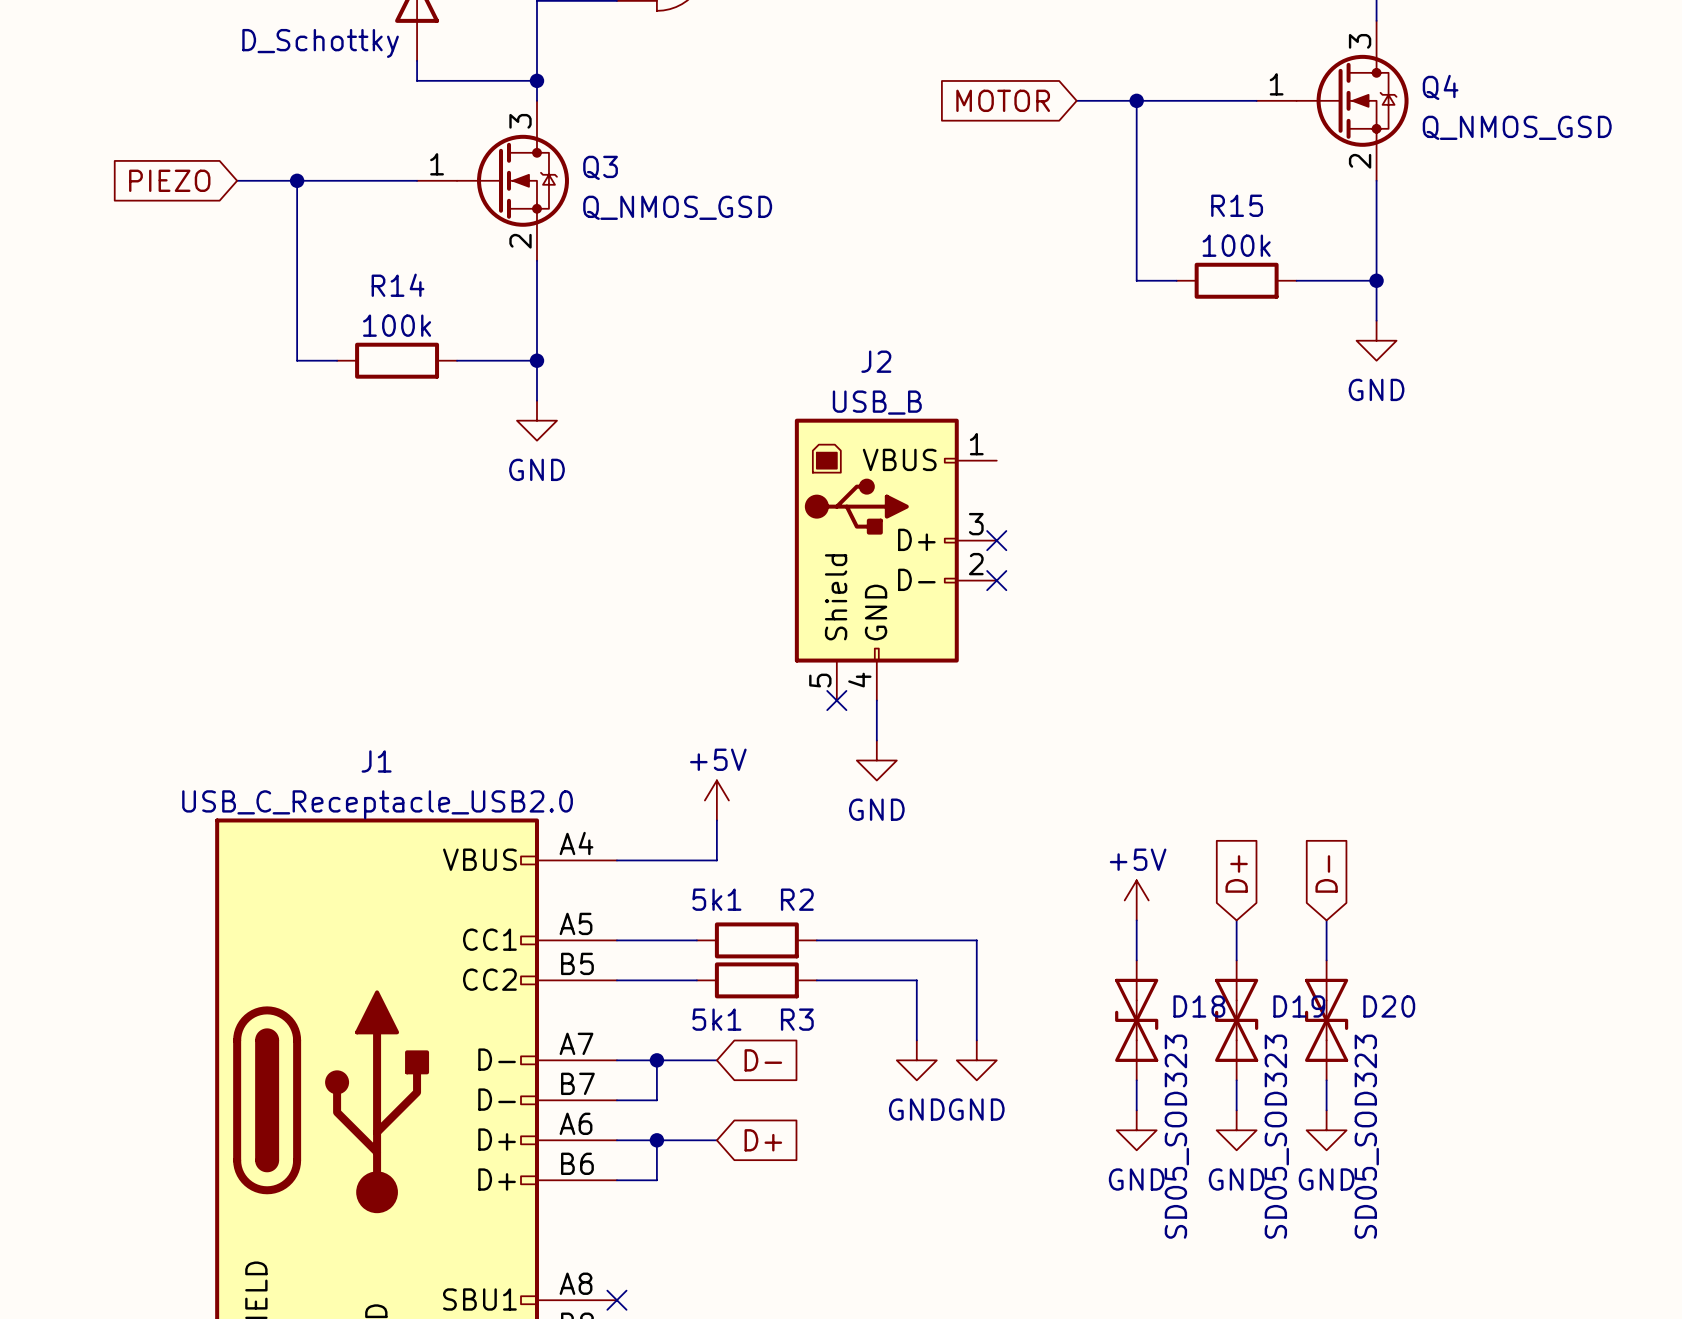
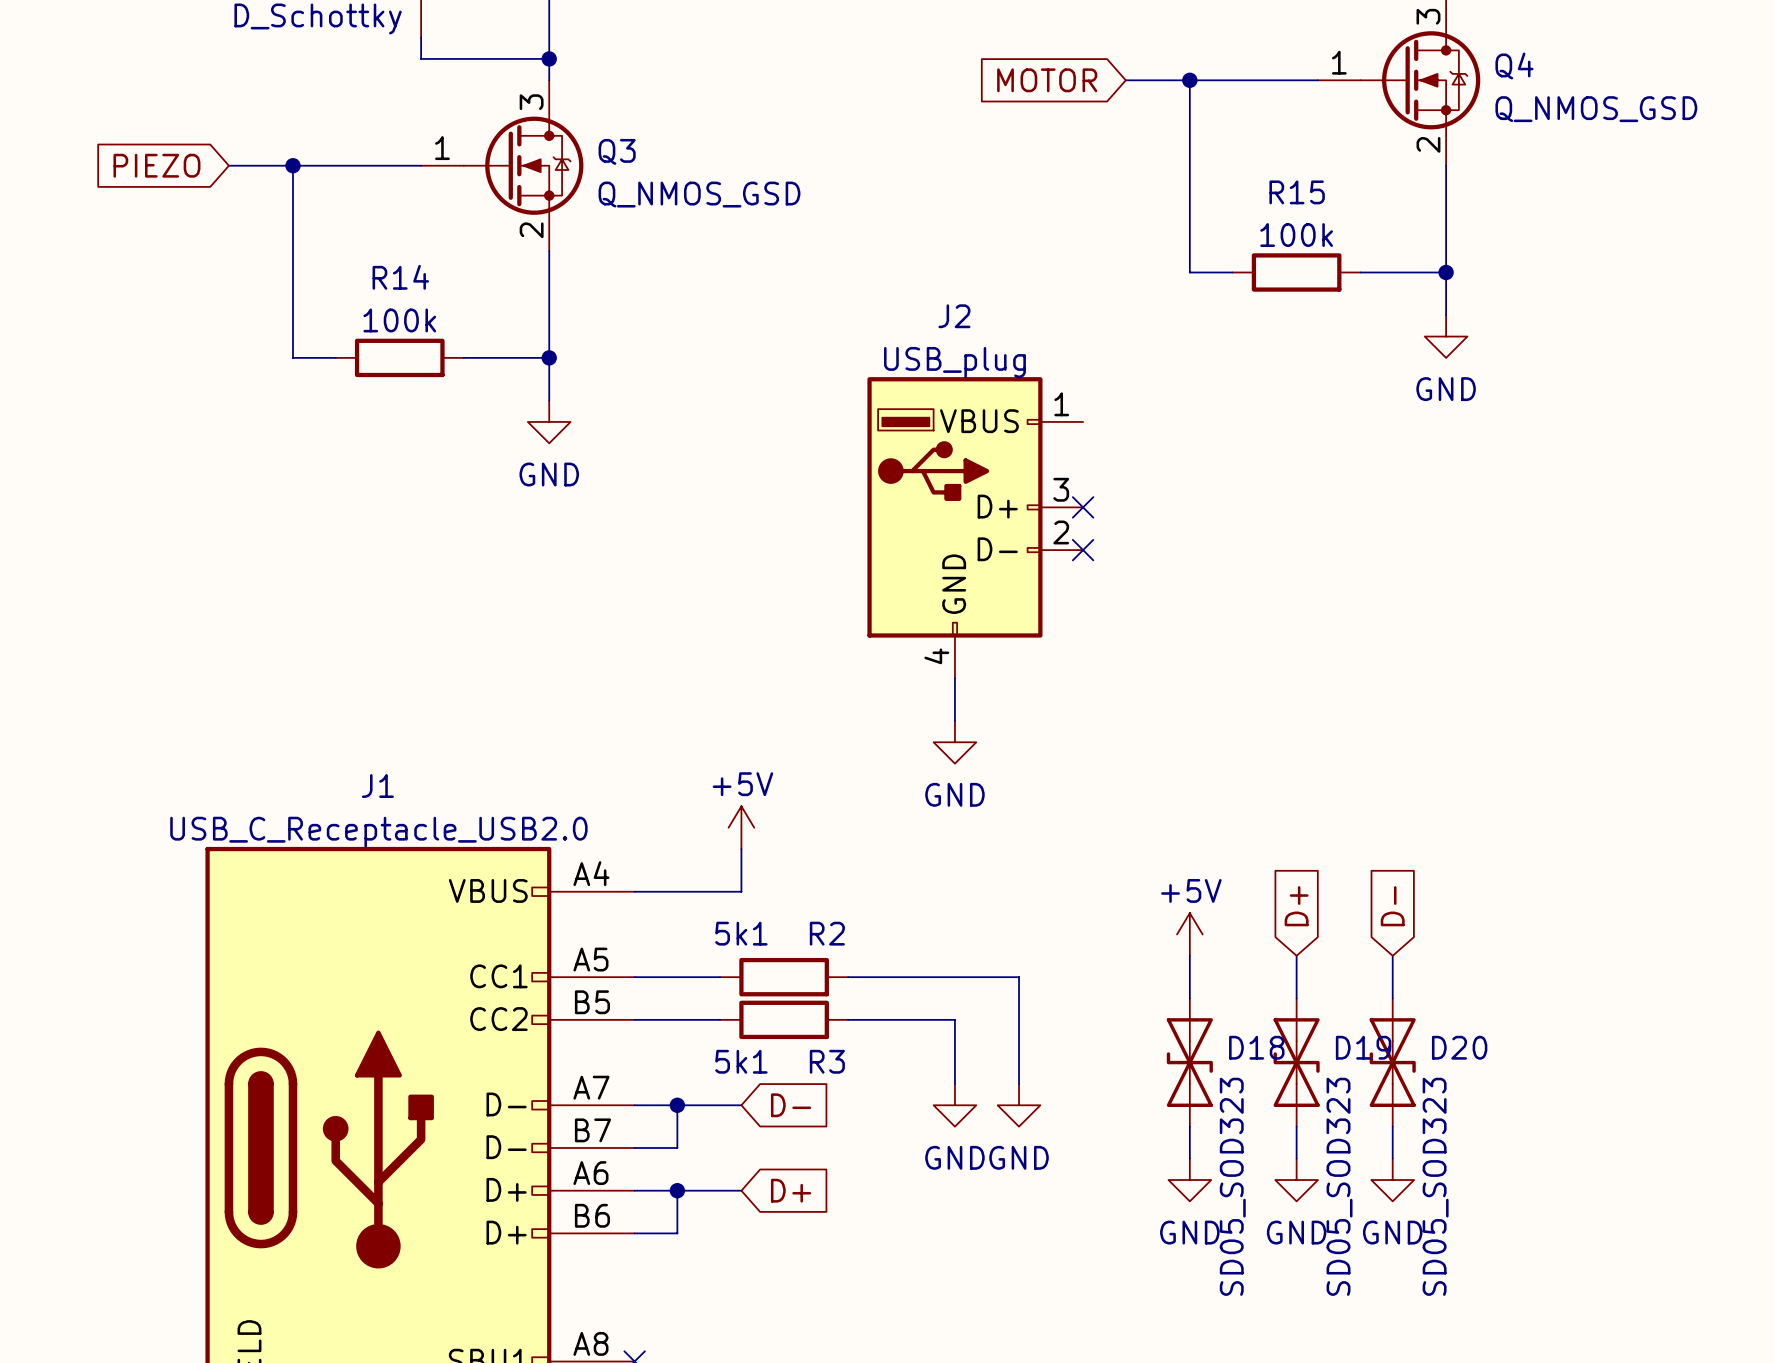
J2 value: USB_B (877, 402) -> USB_plug (954, 362)
J2 symbol: [794, 418, 997, 701] -> [867, 377, 1084, 679]
no-connect mark: none -> (1083, 507)
no-connect mark: (996, 540) -> none
no-connect mark: none -> (1083, 550)
no-connect mark: (996, 580) -> none
no-connect mark: (836, 700) -> none
wire: (876, 700) (876, 740) -> (954, 678) (954, 720)
power symbol position: GND (876, 760) -> GND (954, 742)

